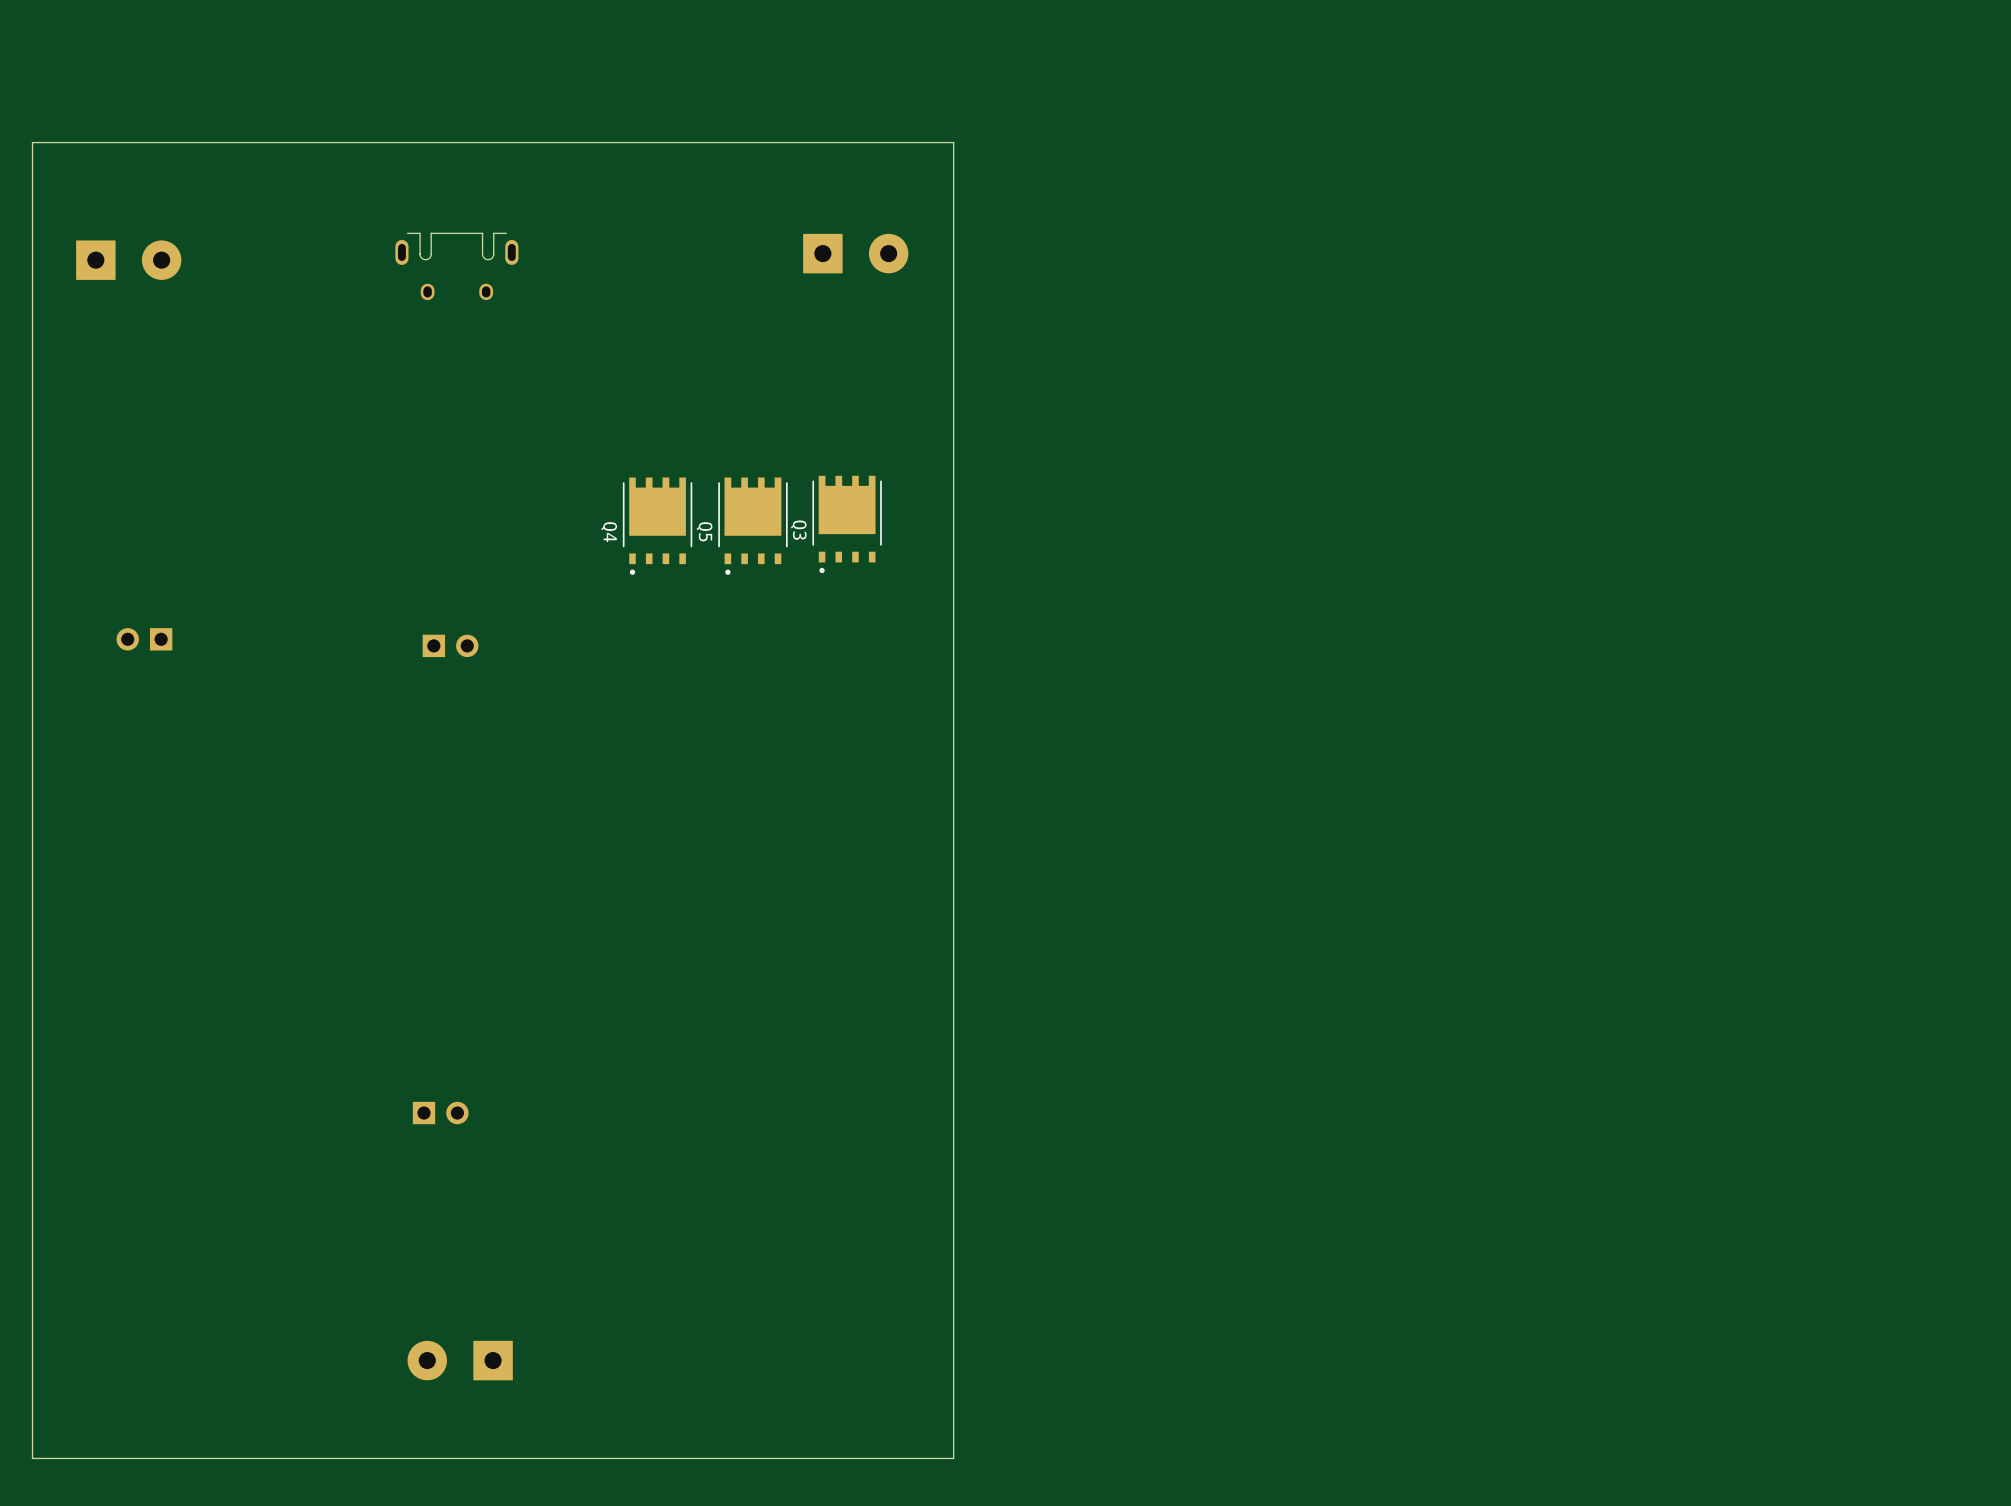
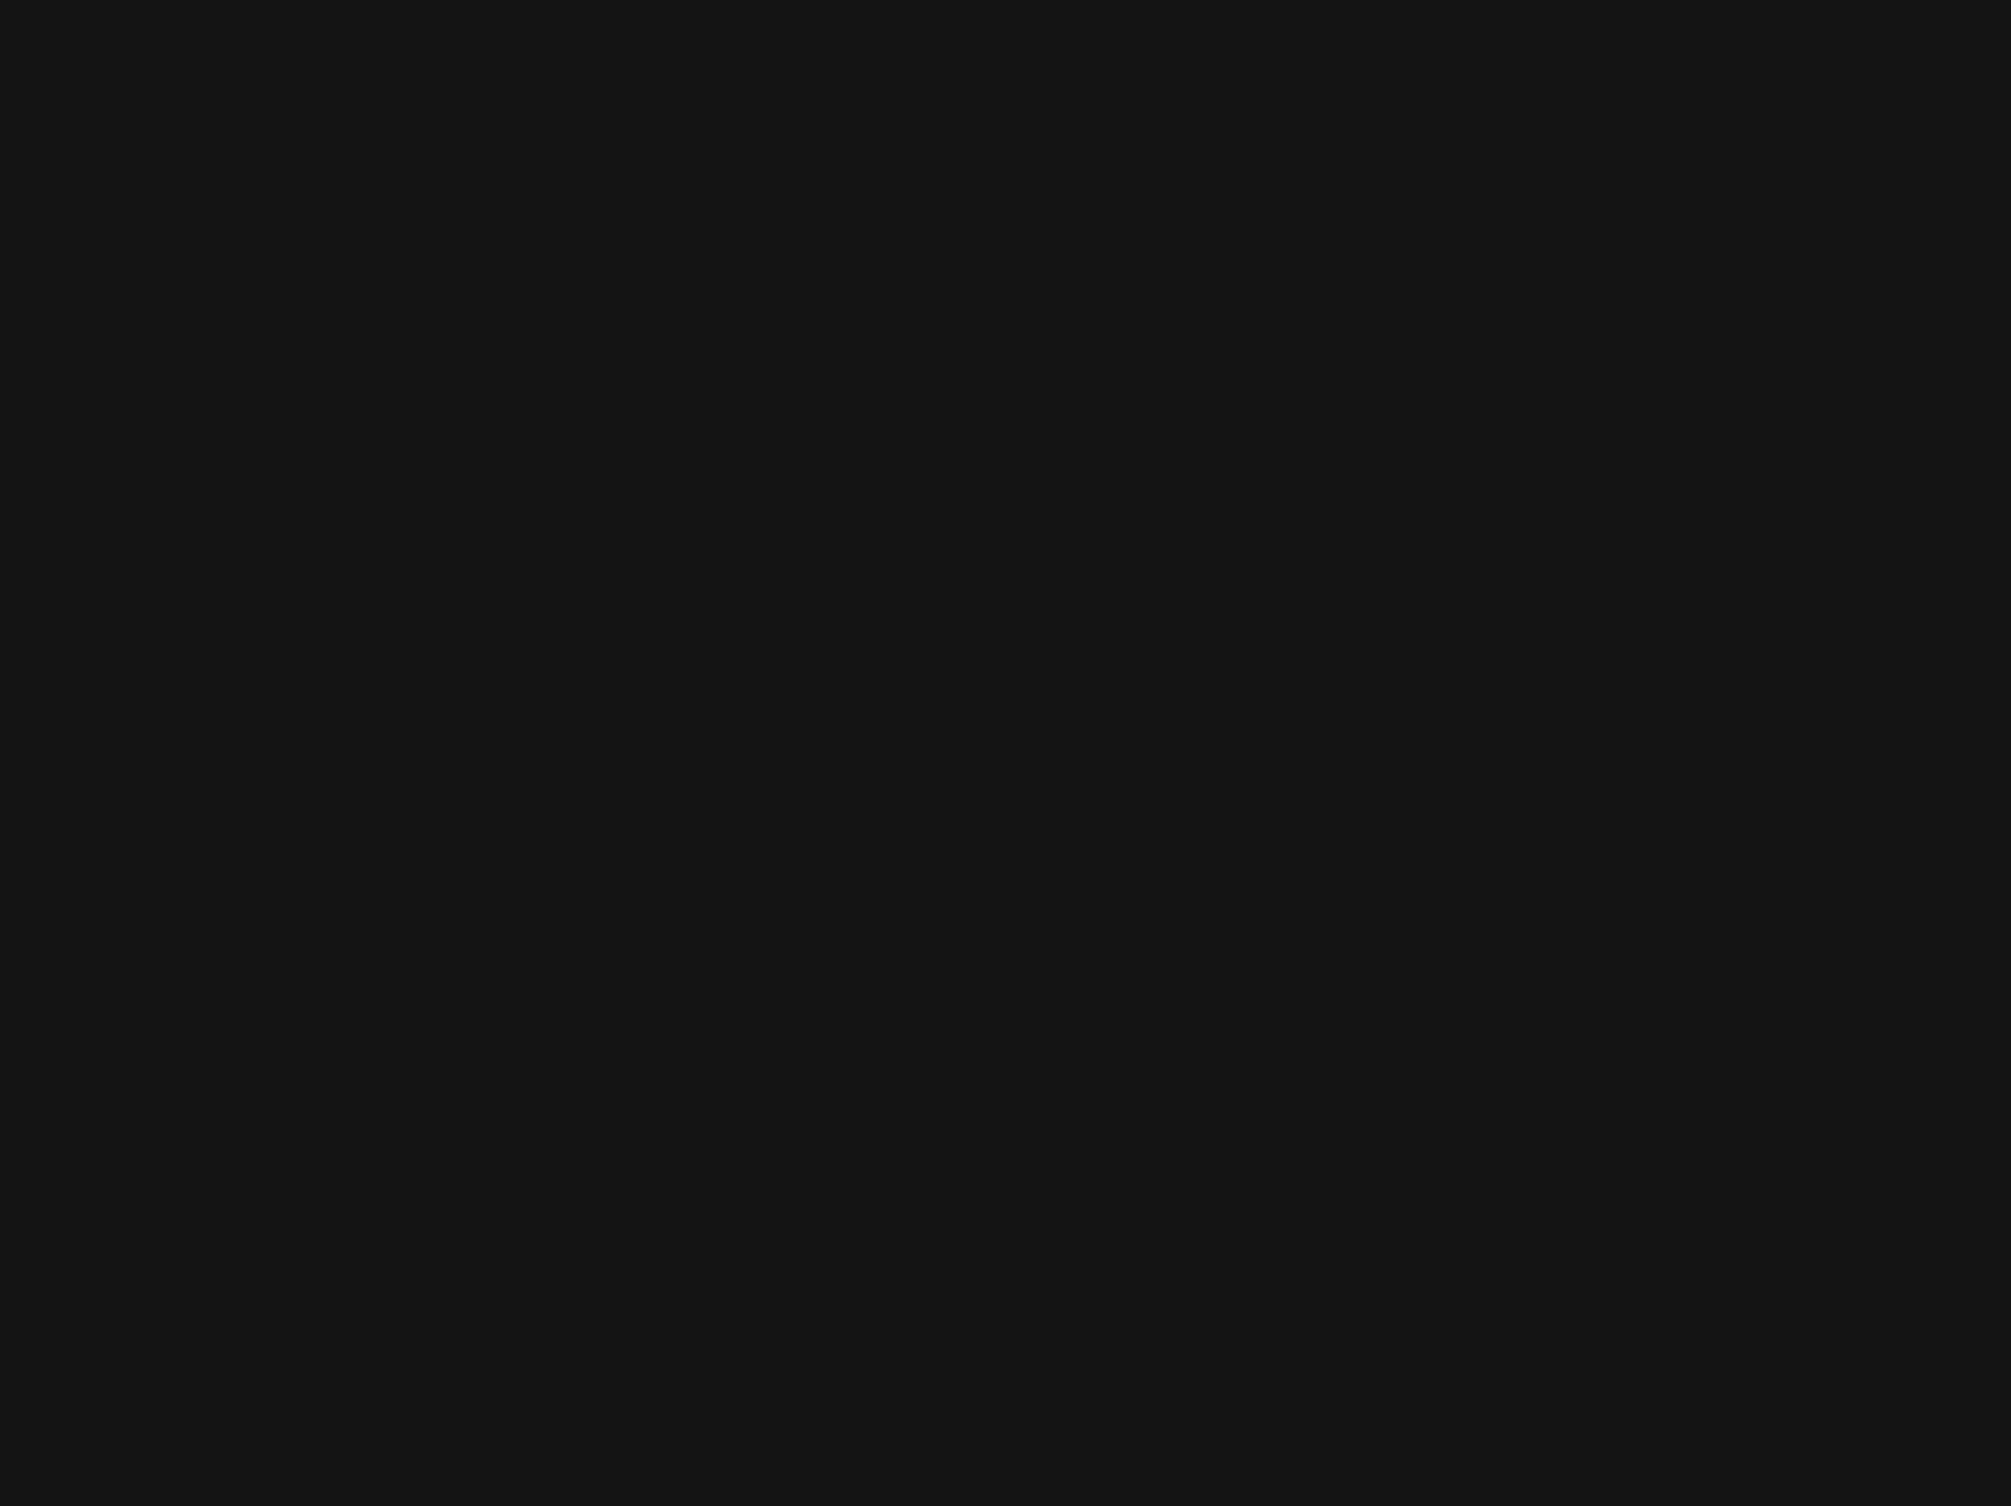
board edge: (953, 142) (32, 142) (32, 1458) (953, 1458) (953, 142) -> none
part: (855, 253) -> none
part: (128, 260) -> none
part: (456, 266) -> none
Q3: (847, 524) -> none
Q4: (657, 526) -> none
Q5: (752, 526) -> none
part: (144, 639) -> none
part: (450, 645) -> none
part: (440, 1113) -> none
part: (460, 1360) -> none

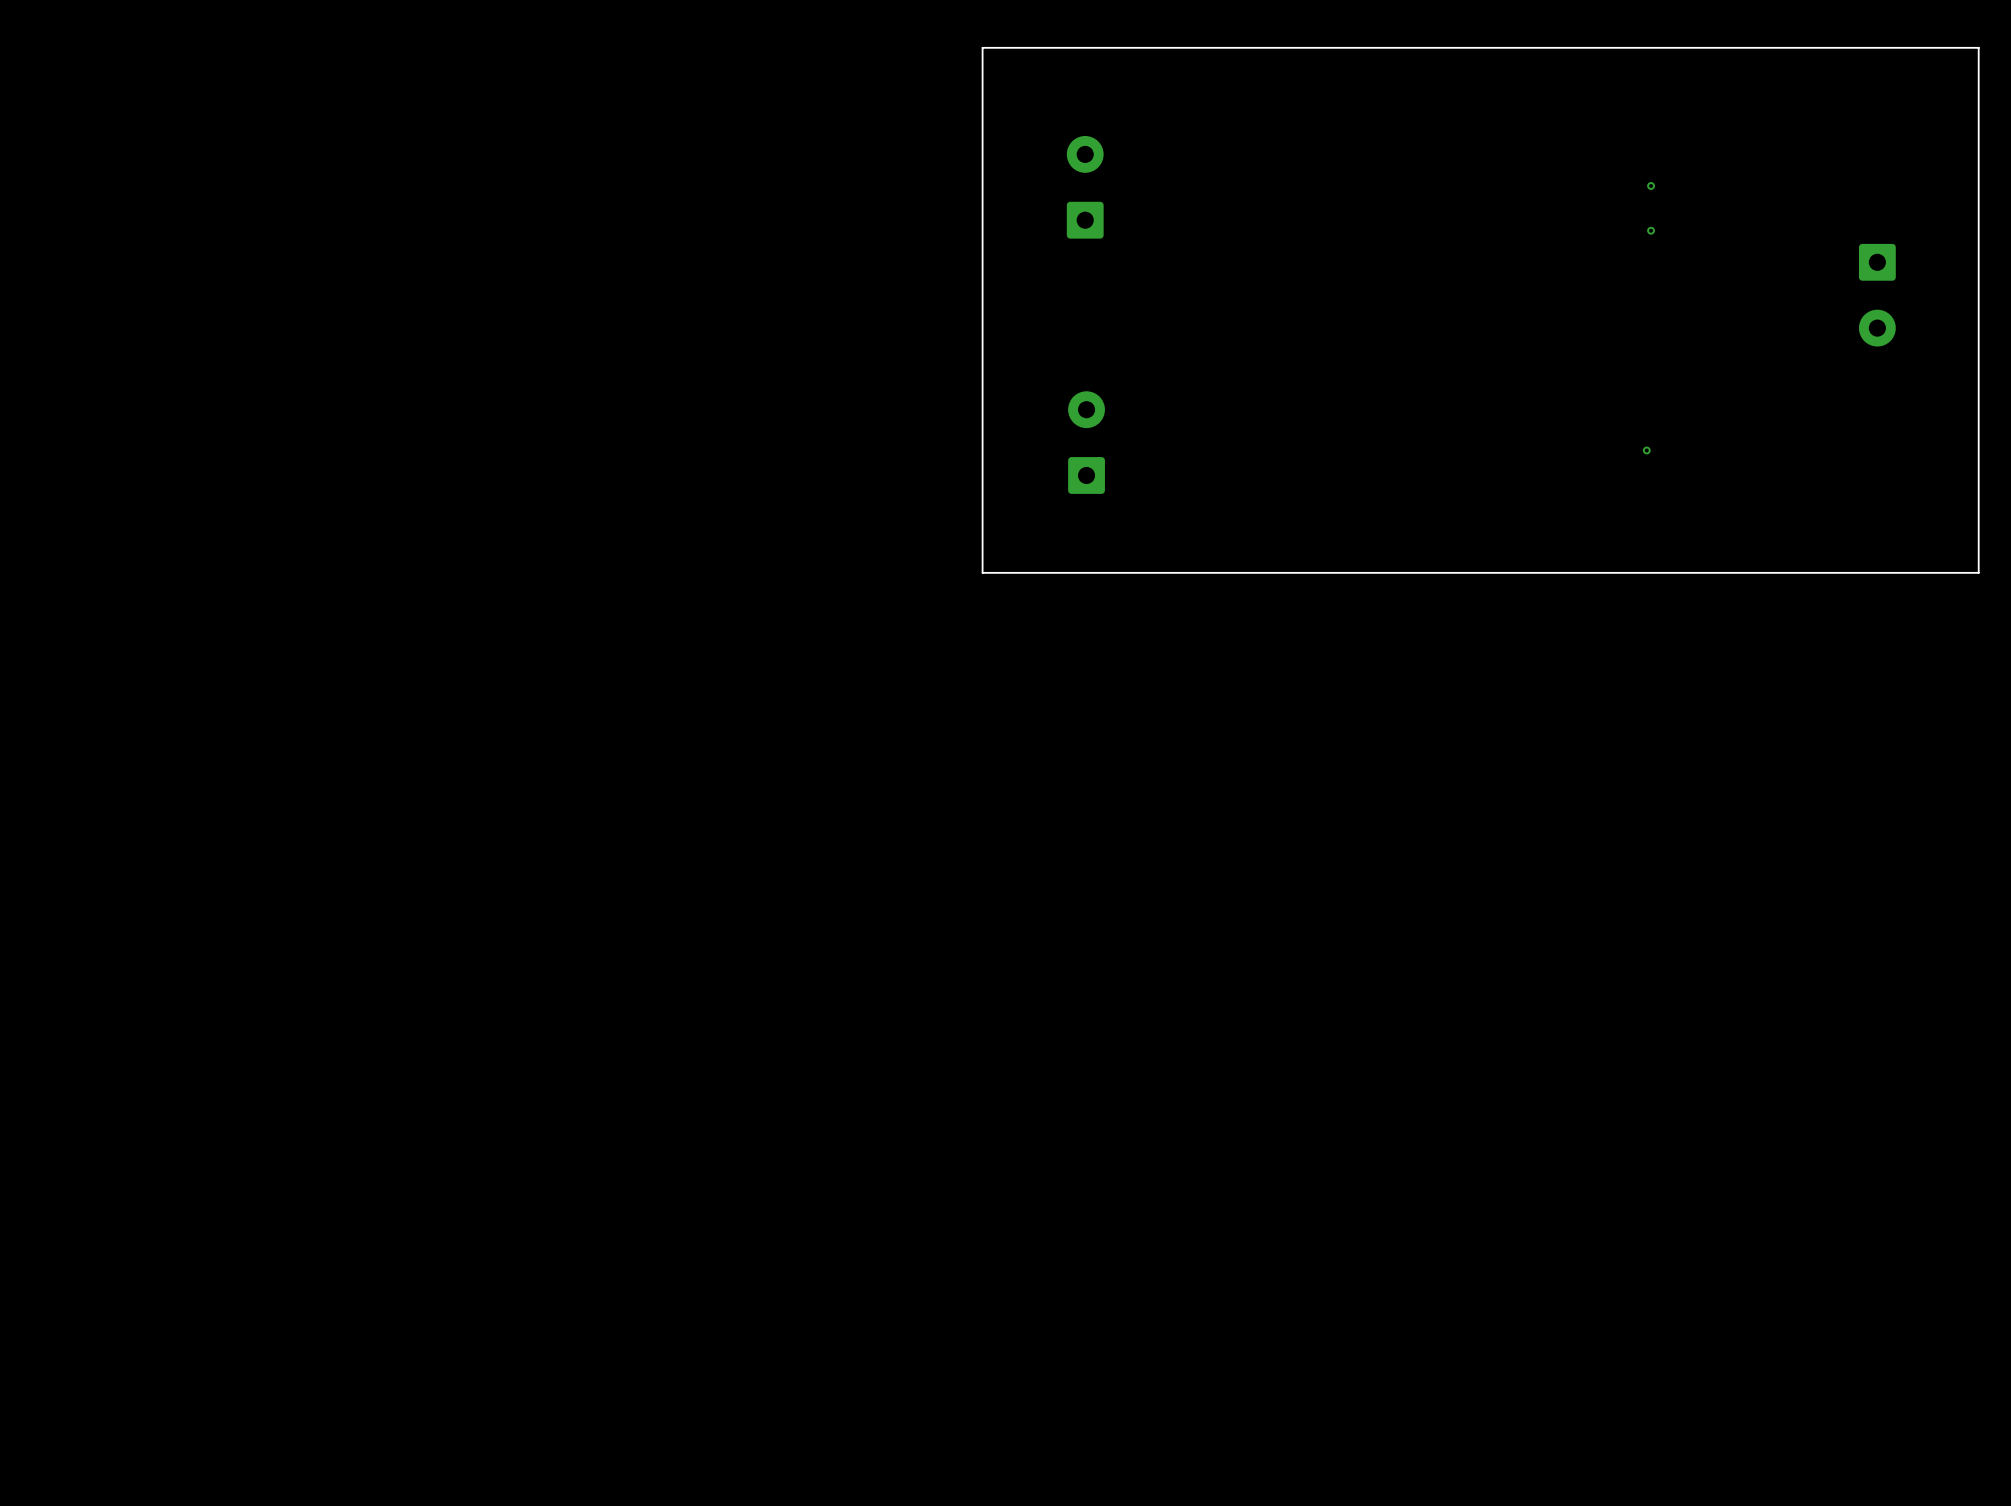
board edge: none -> (1978, 47) (982, 47) (982, 572) (1978, 572) (1978, 47)
via: none -> (1651, 185)
part: none -> (1085, 187)
via: none -> (1651, 230)
part: none -> (1877, 295)
part: none -> (1086, 442)
via: none -> (1646, 450)

